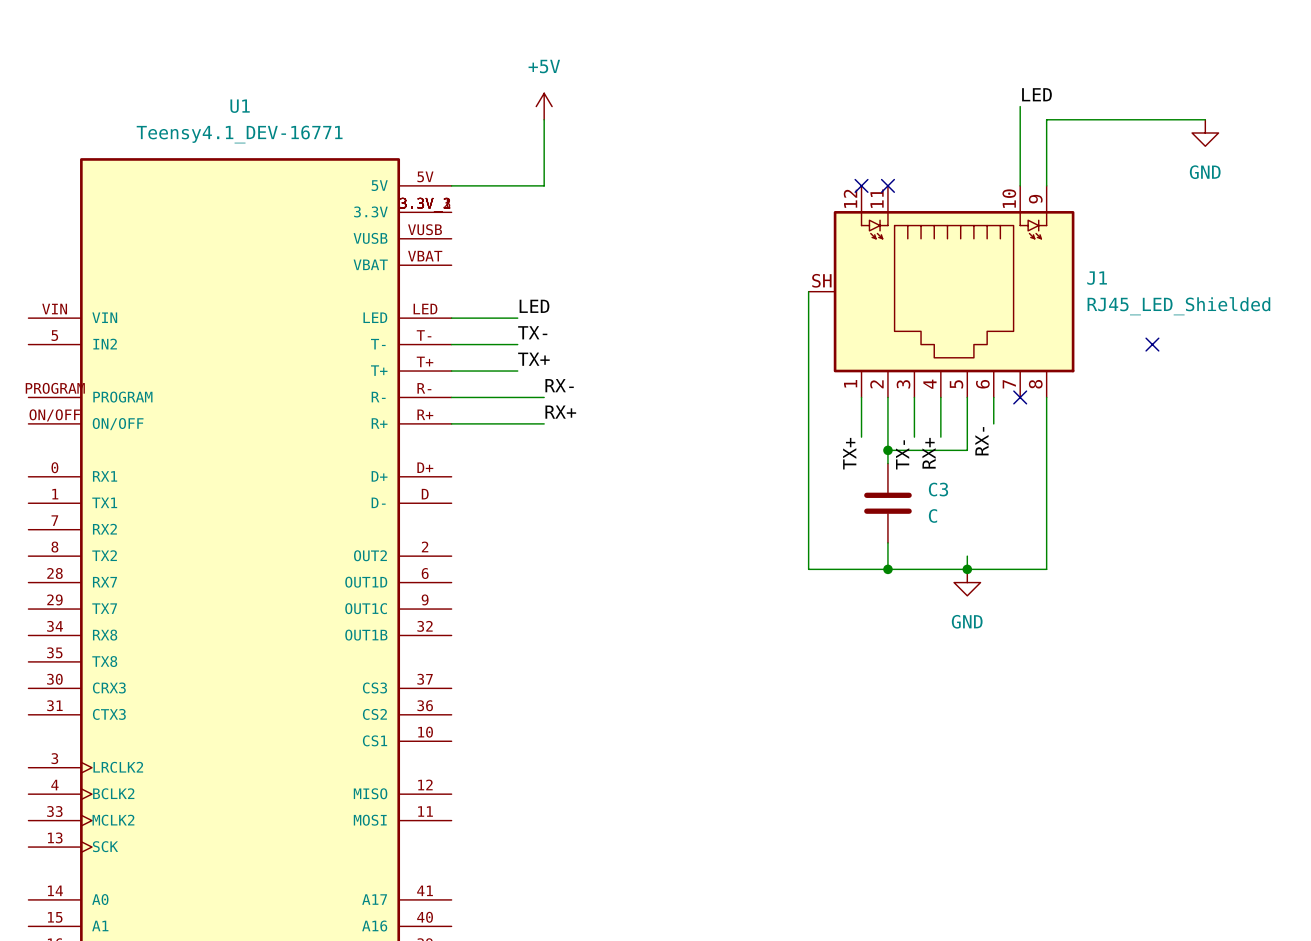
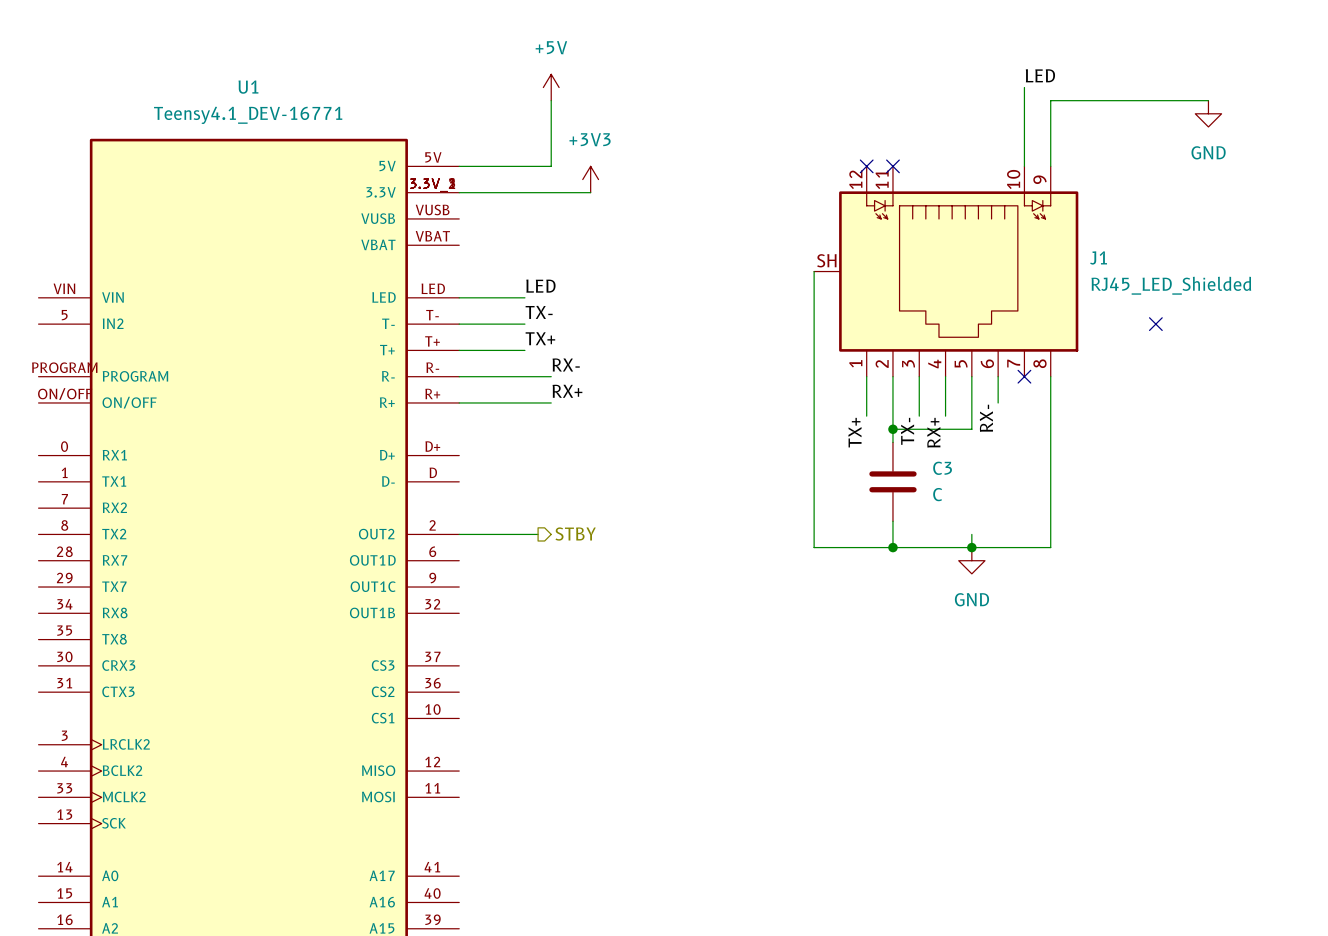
power symbol: none -> +3V3 (590, 179)
wire: none -> (459, 192) (590, 192)
hierarchical label: none -> STBY (575, 534)
wire: none -> (459, 534) (538, 534)

